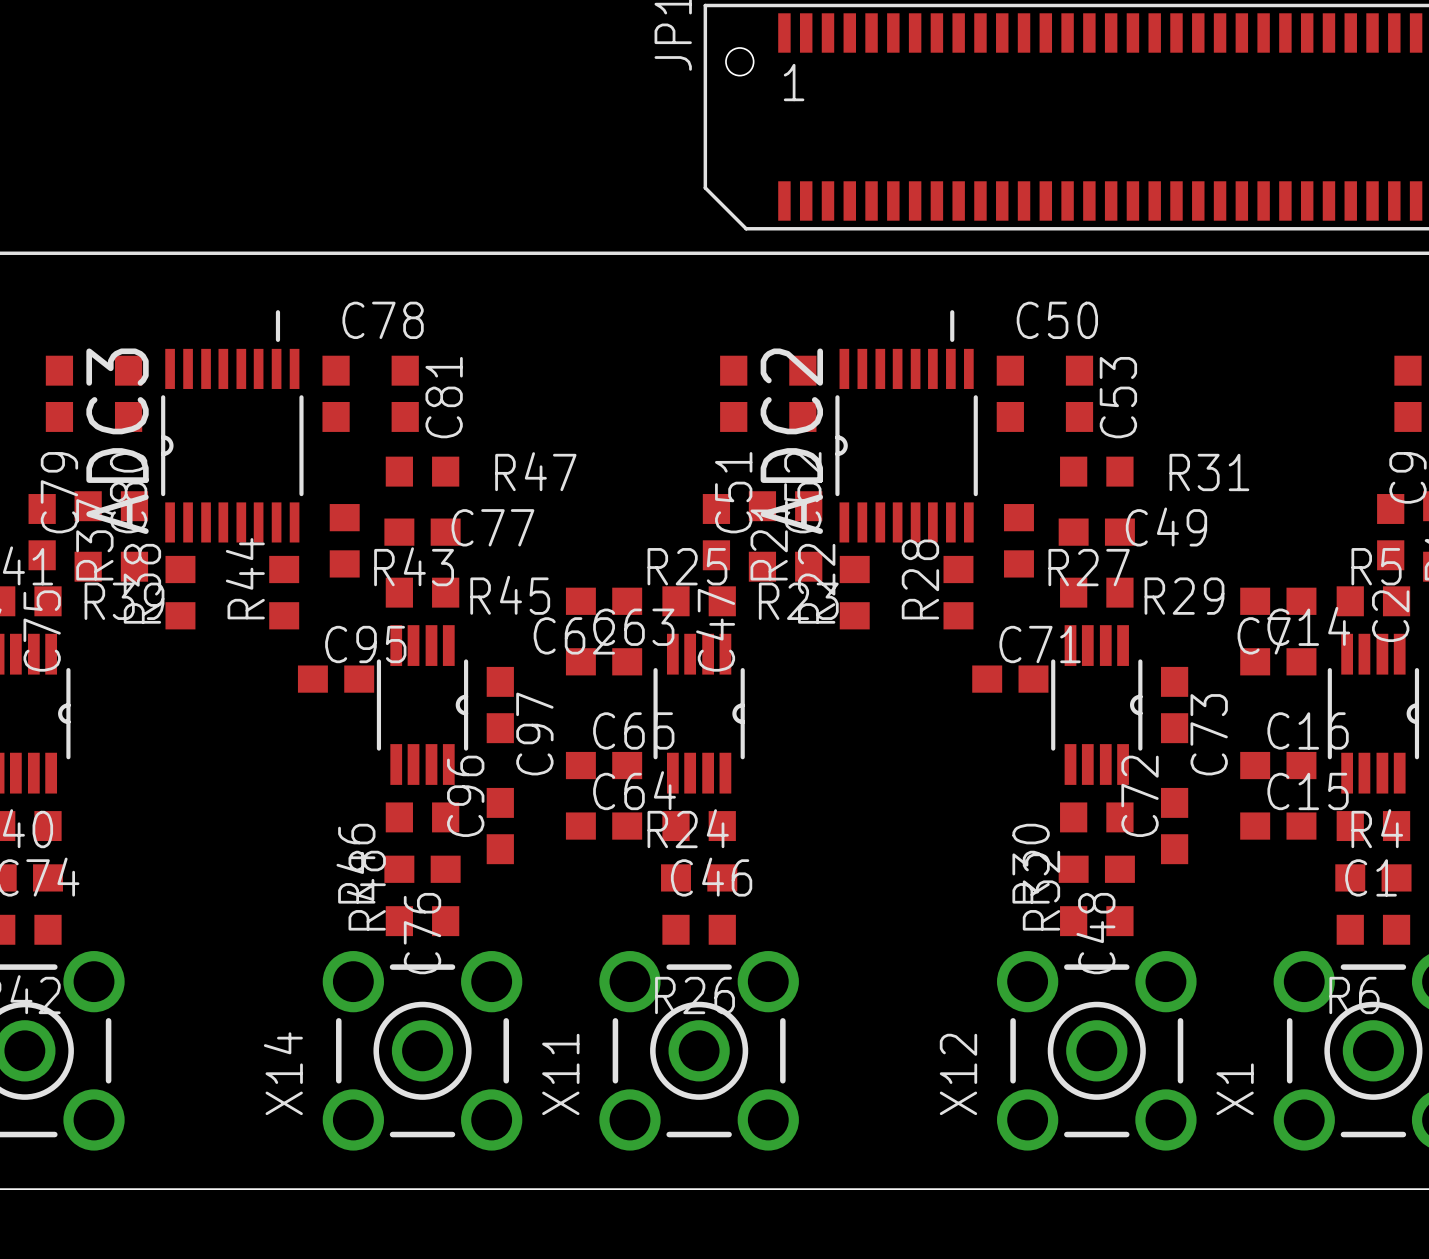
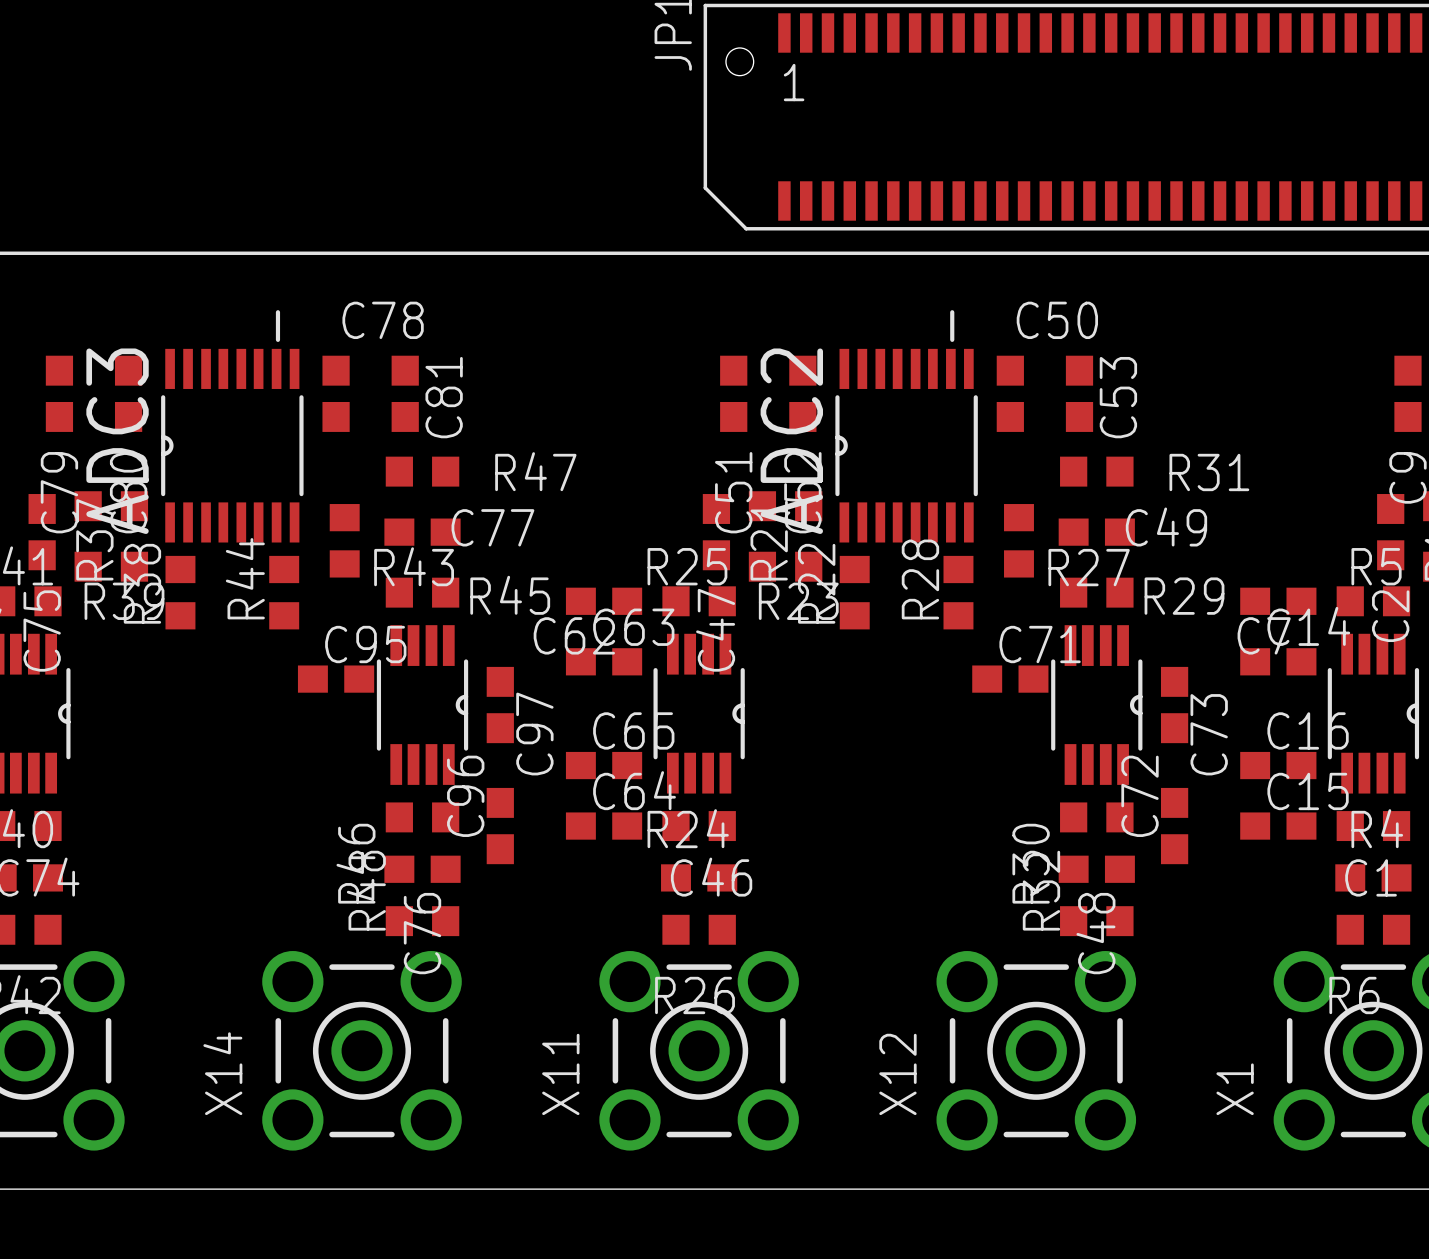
X14 position: (422, 1050) -> (362, 1050)
X12 position: (1096, 1050) -> (1036, 1050)

